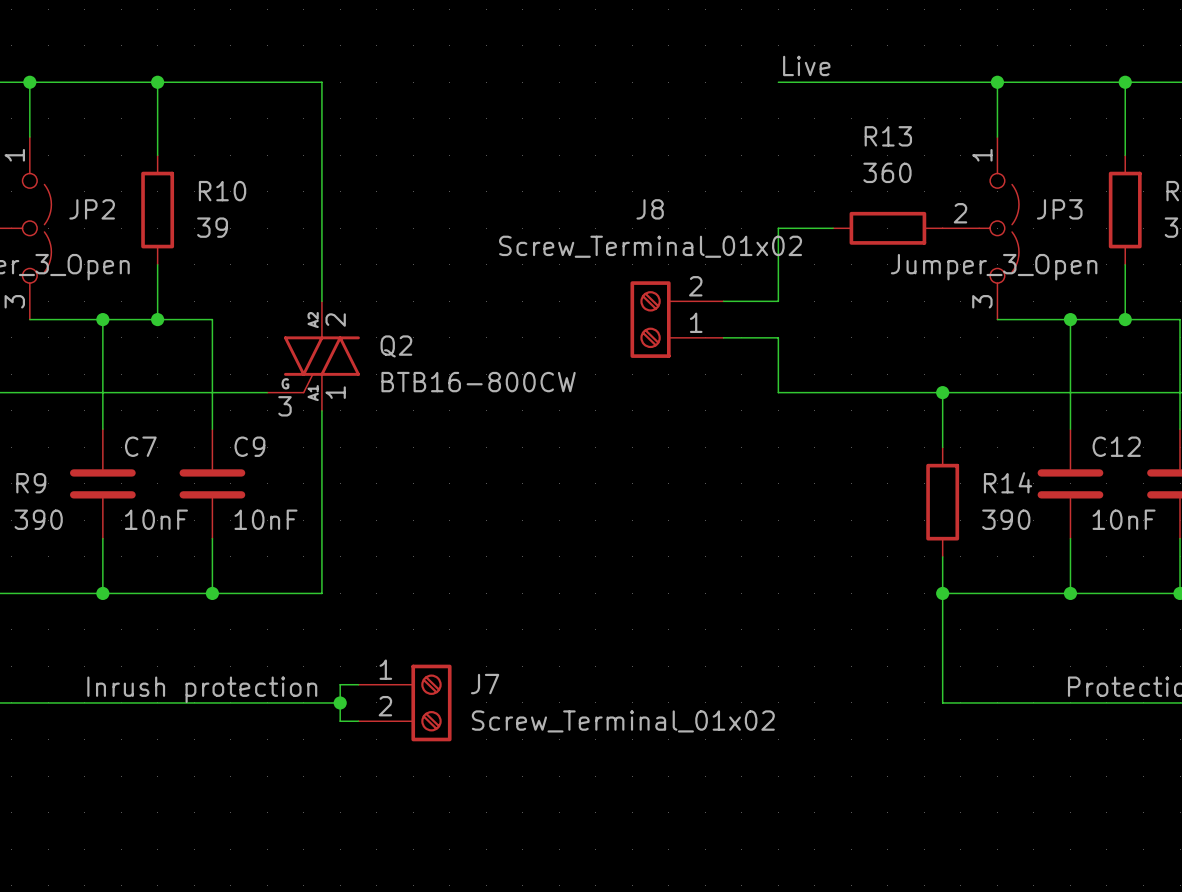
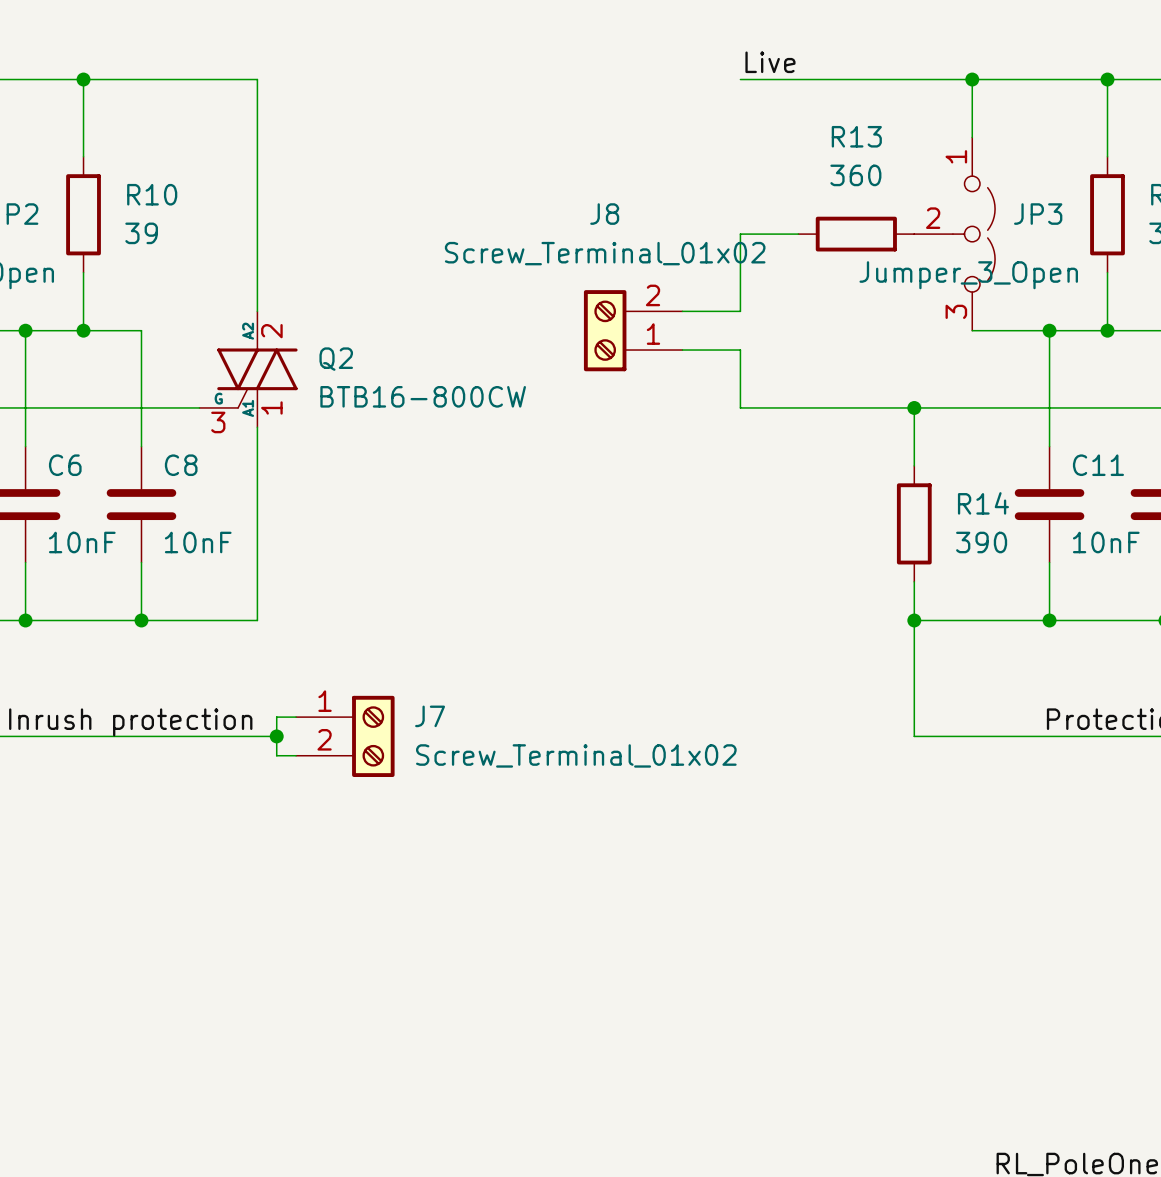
C7 name: C7 (140, 446) -> C6 (65, 465)
C9 name: C9 (249, 446) -> C8 (181, 465)
C12 name: C12 (1116, 446) -> C11 (1098, 465)

